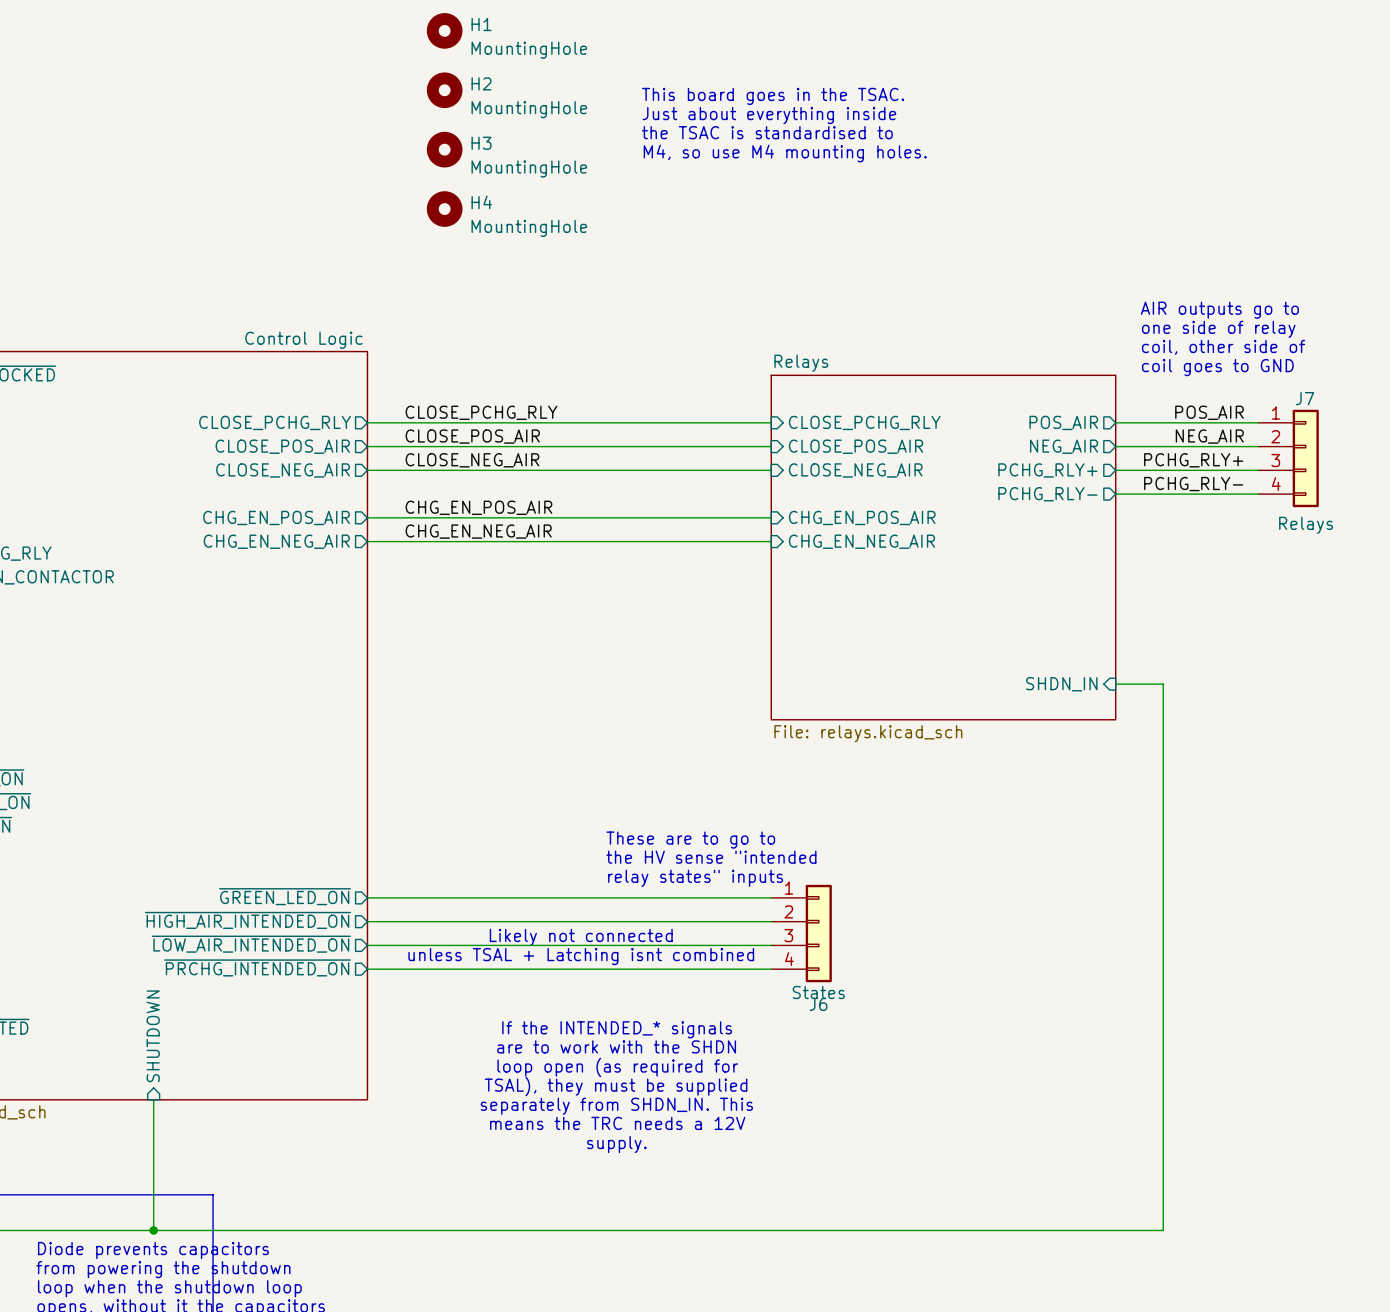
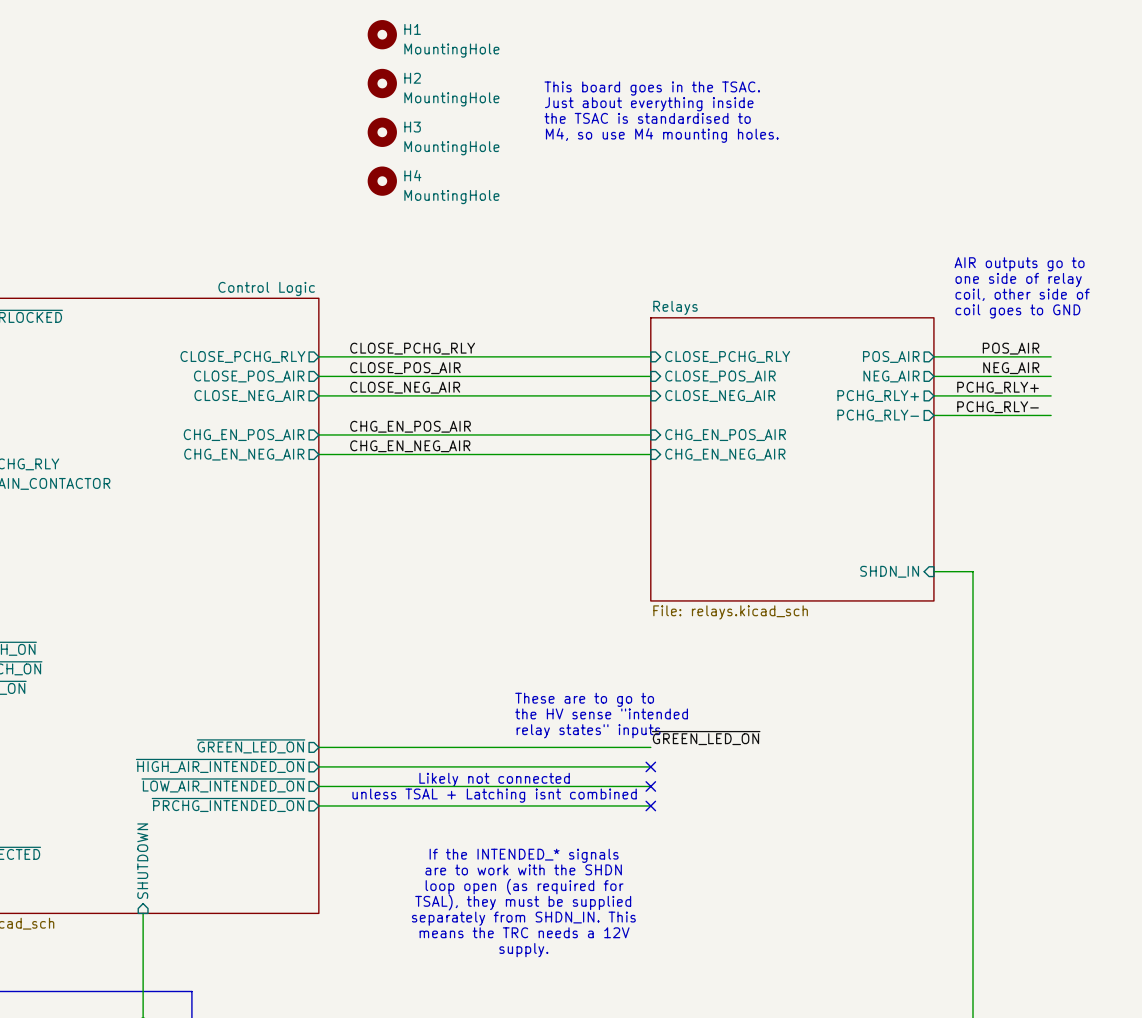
J7: Relays (1288, 458) -> none
label: none -> ~{GREEN_LED_ON} (706, 738)
no-connect mark: none -> (650, 766)
J6: States (801, 933) -> none
no-connect mark: none -> (650, 786)
no-connect mark: none -> (650, 805)

